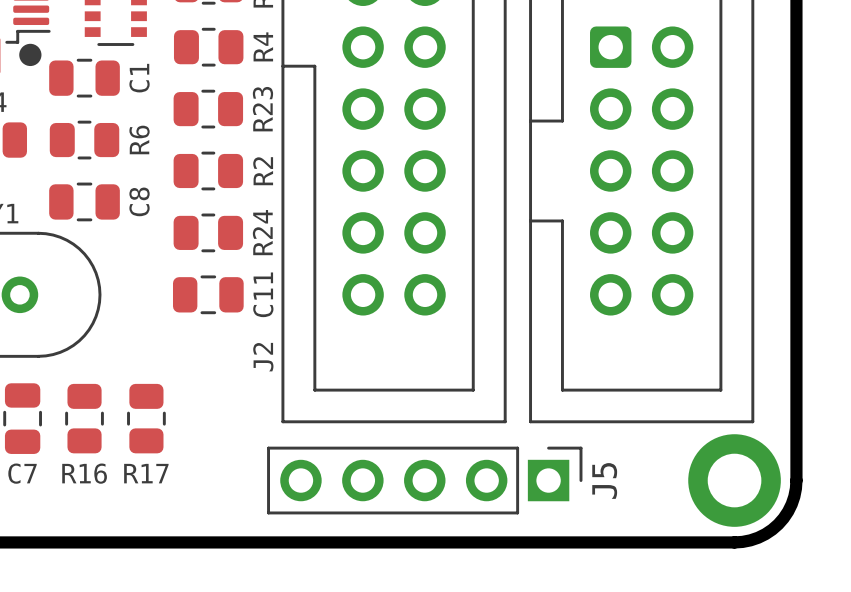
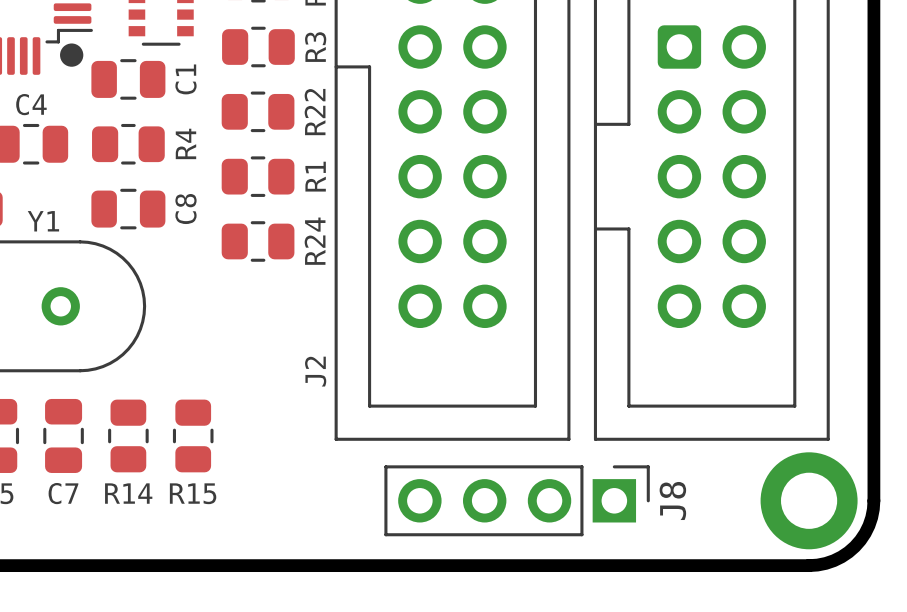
R4 name: R4 (263, 46) -> R3 (315, 47)
R23 name: R23 (262, 109) -> R22 (315, 112)
R6 name: R6 (139, 139) -> R4 (185, 143)
R2 name: R2 (263, 171) -> R1 (315, 176)
C11: (208, 294) -> none
R16 name: R16 (84, 473) -> R14 (128, 493)
R17 name: R17 (146, 473) -> R15 (193, 493)
J5: (424, 480) -> none
J8: none -> (517, 500)

